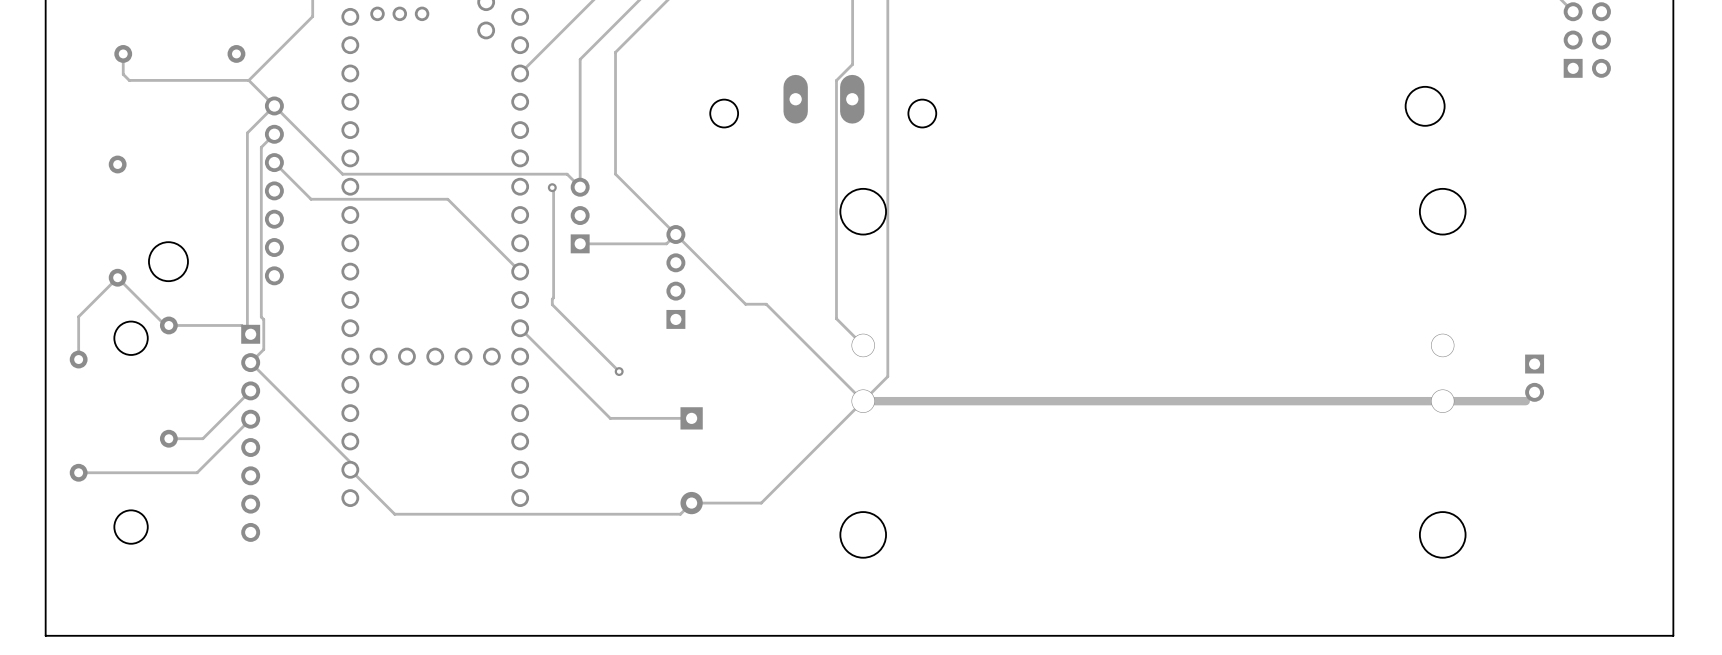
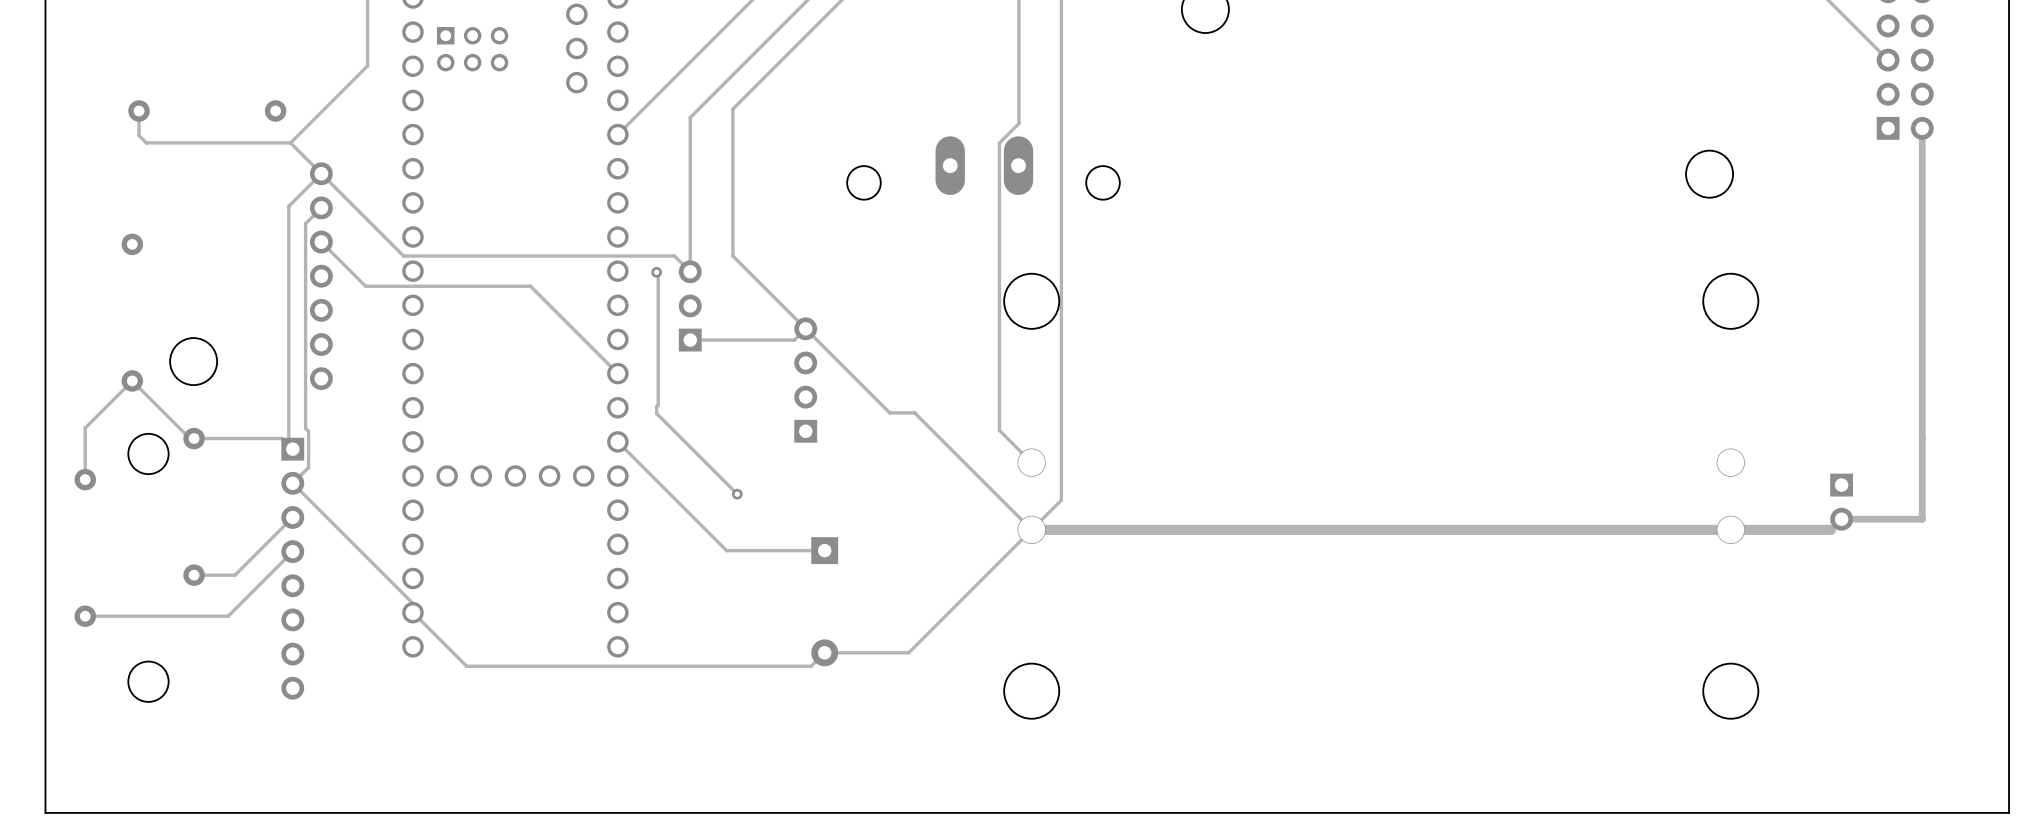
track: none -> (1922, 128) (1922, 519) (1841, 519)

